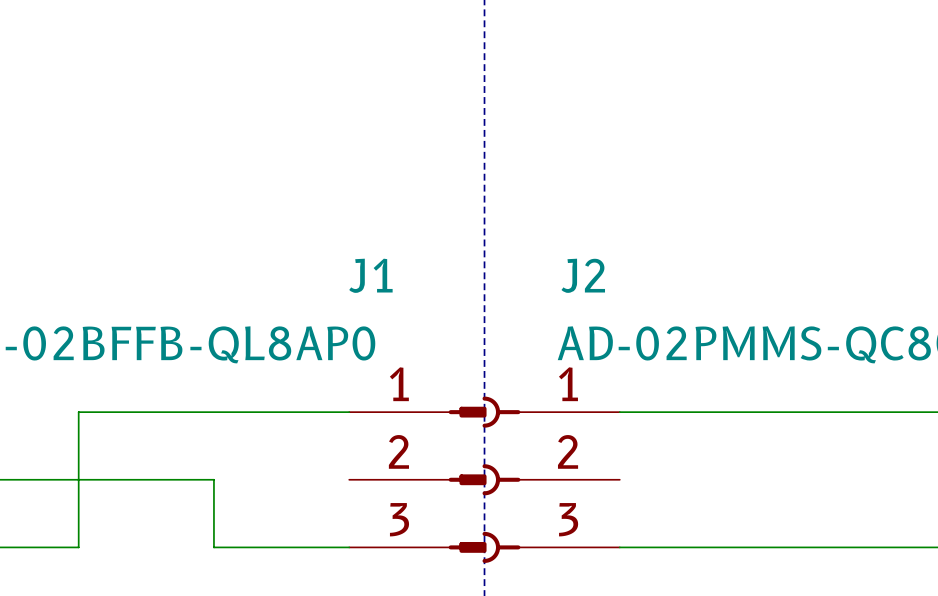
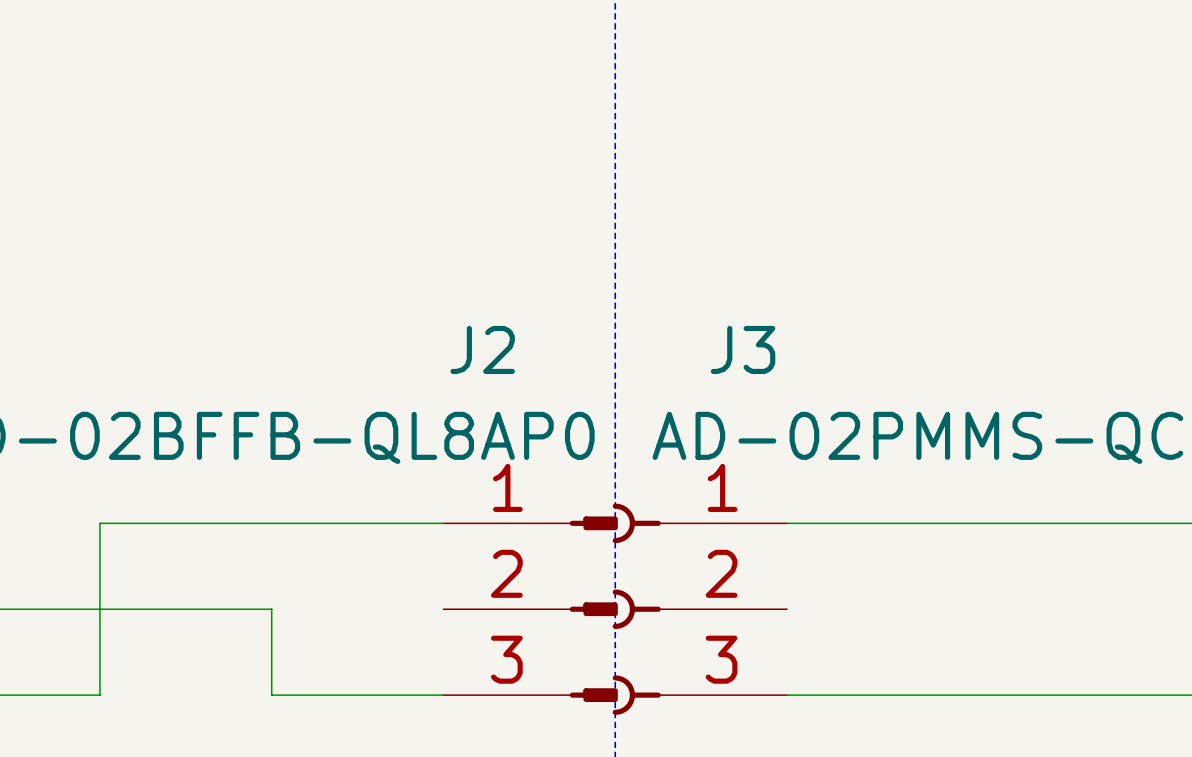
J1 name: J1 (370, 275) -> J2 (482, 349)
J2 name: J2 (583, 275) -> J3 (743, 349)

